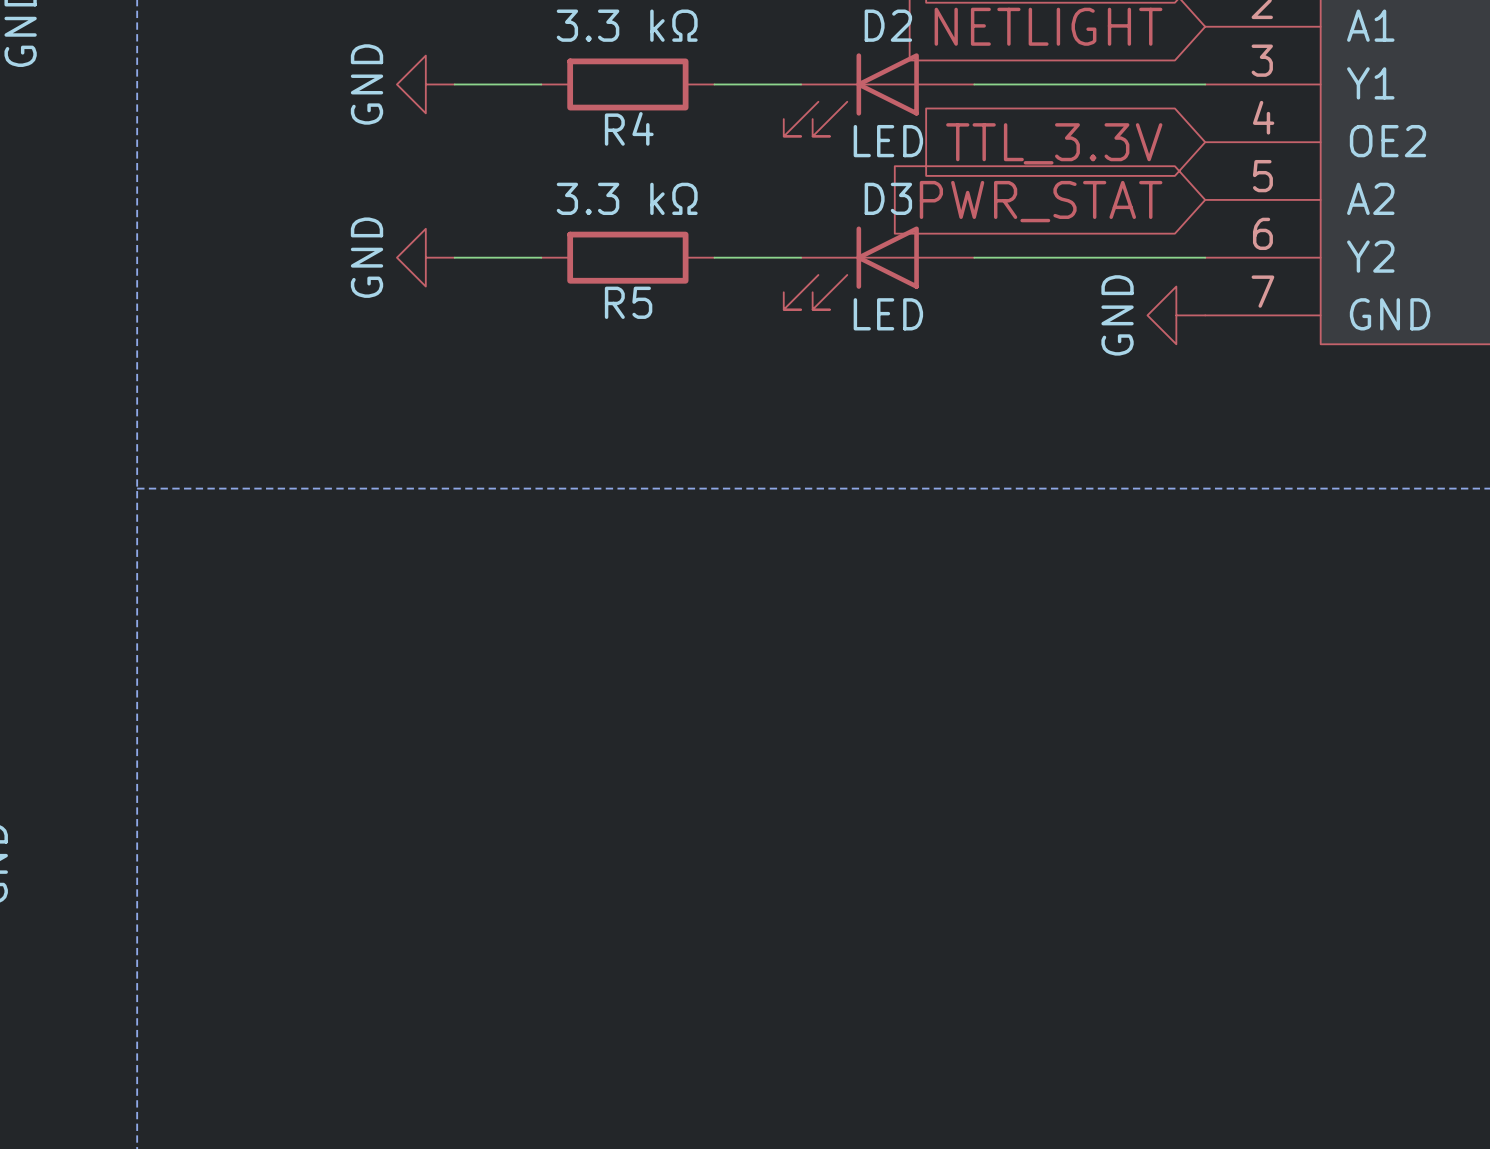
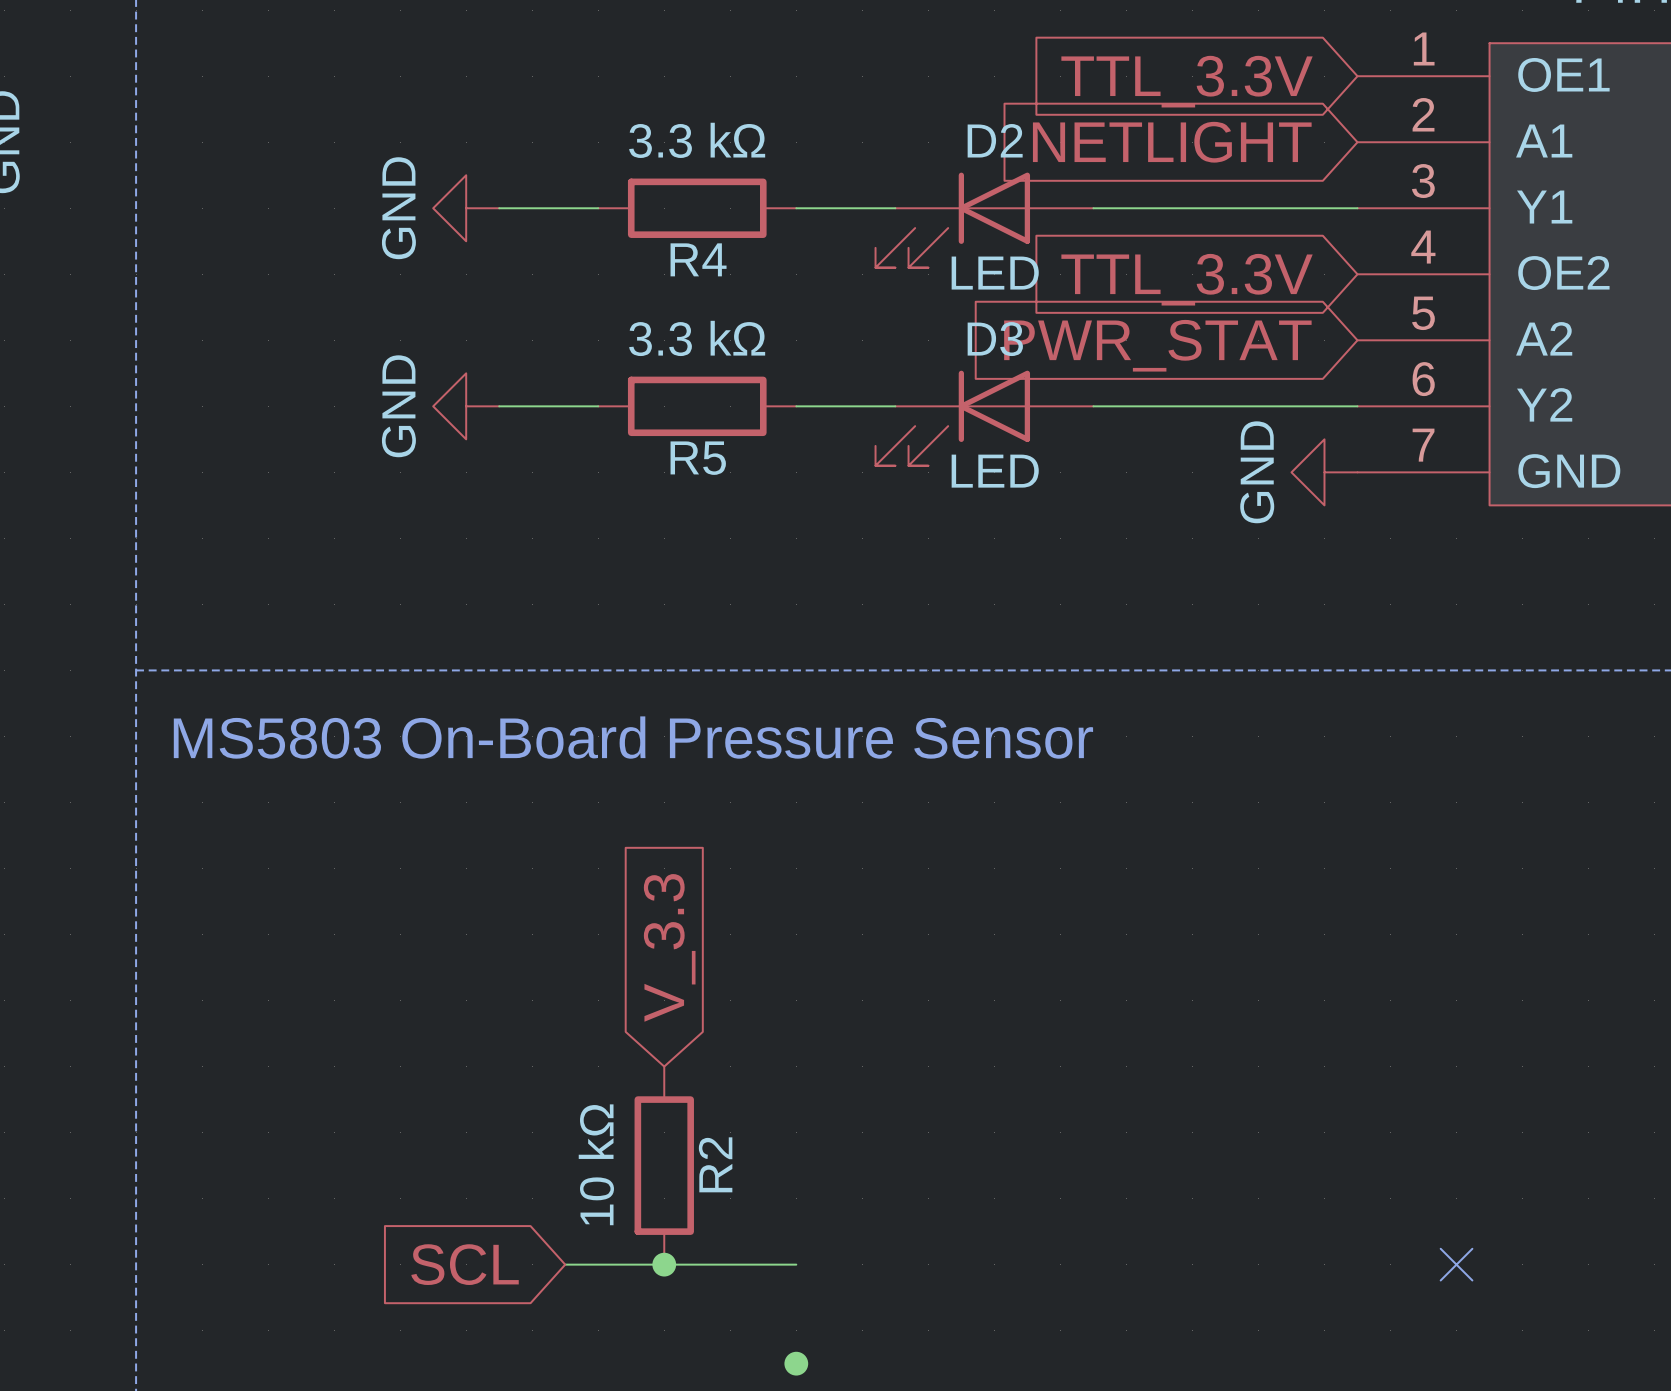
text: none -> MS5803 On-Board Pressure Sensor (633, 737)
global label: none -> V_3.3 (669, 947)
R2: none -> 10 kΩ (664, 1165)
global label: none -> SCL (465, 1264)
wire: none -> (565, 1264) (796, 1264)
junction: none -> (664, 1264)
no-connect mark: none -> (1456, 1264)
junction: none -> (796, 1363)

